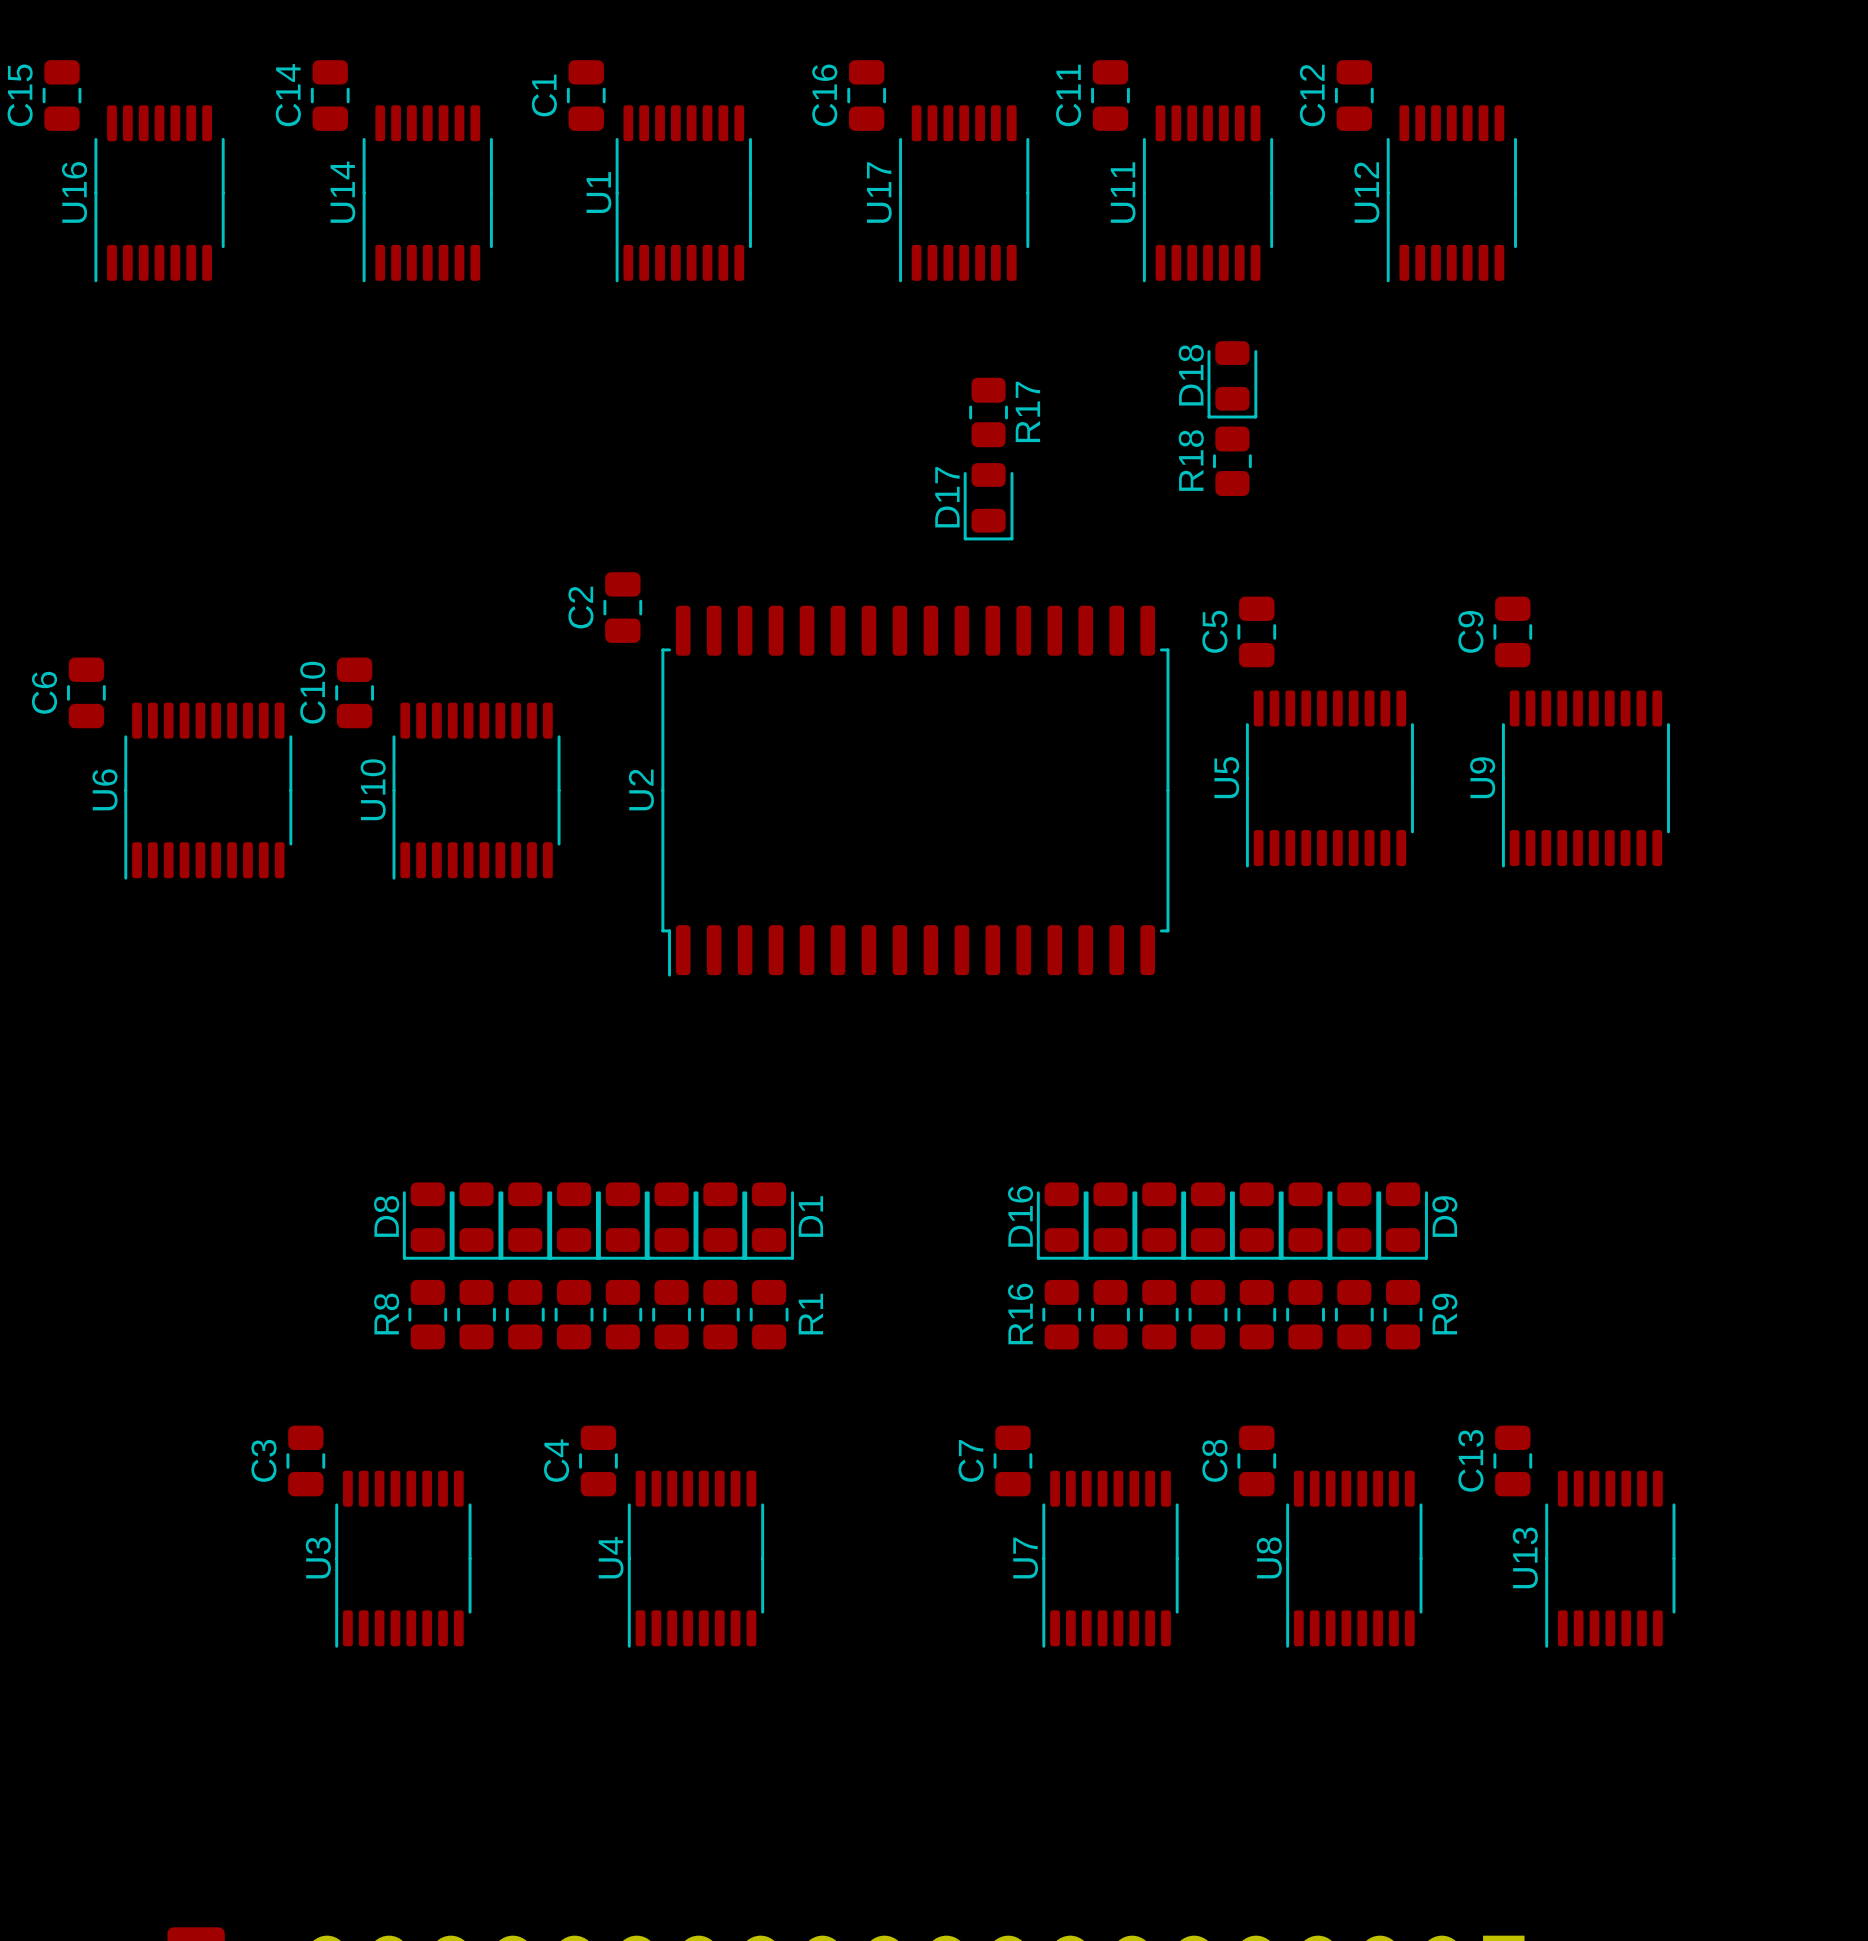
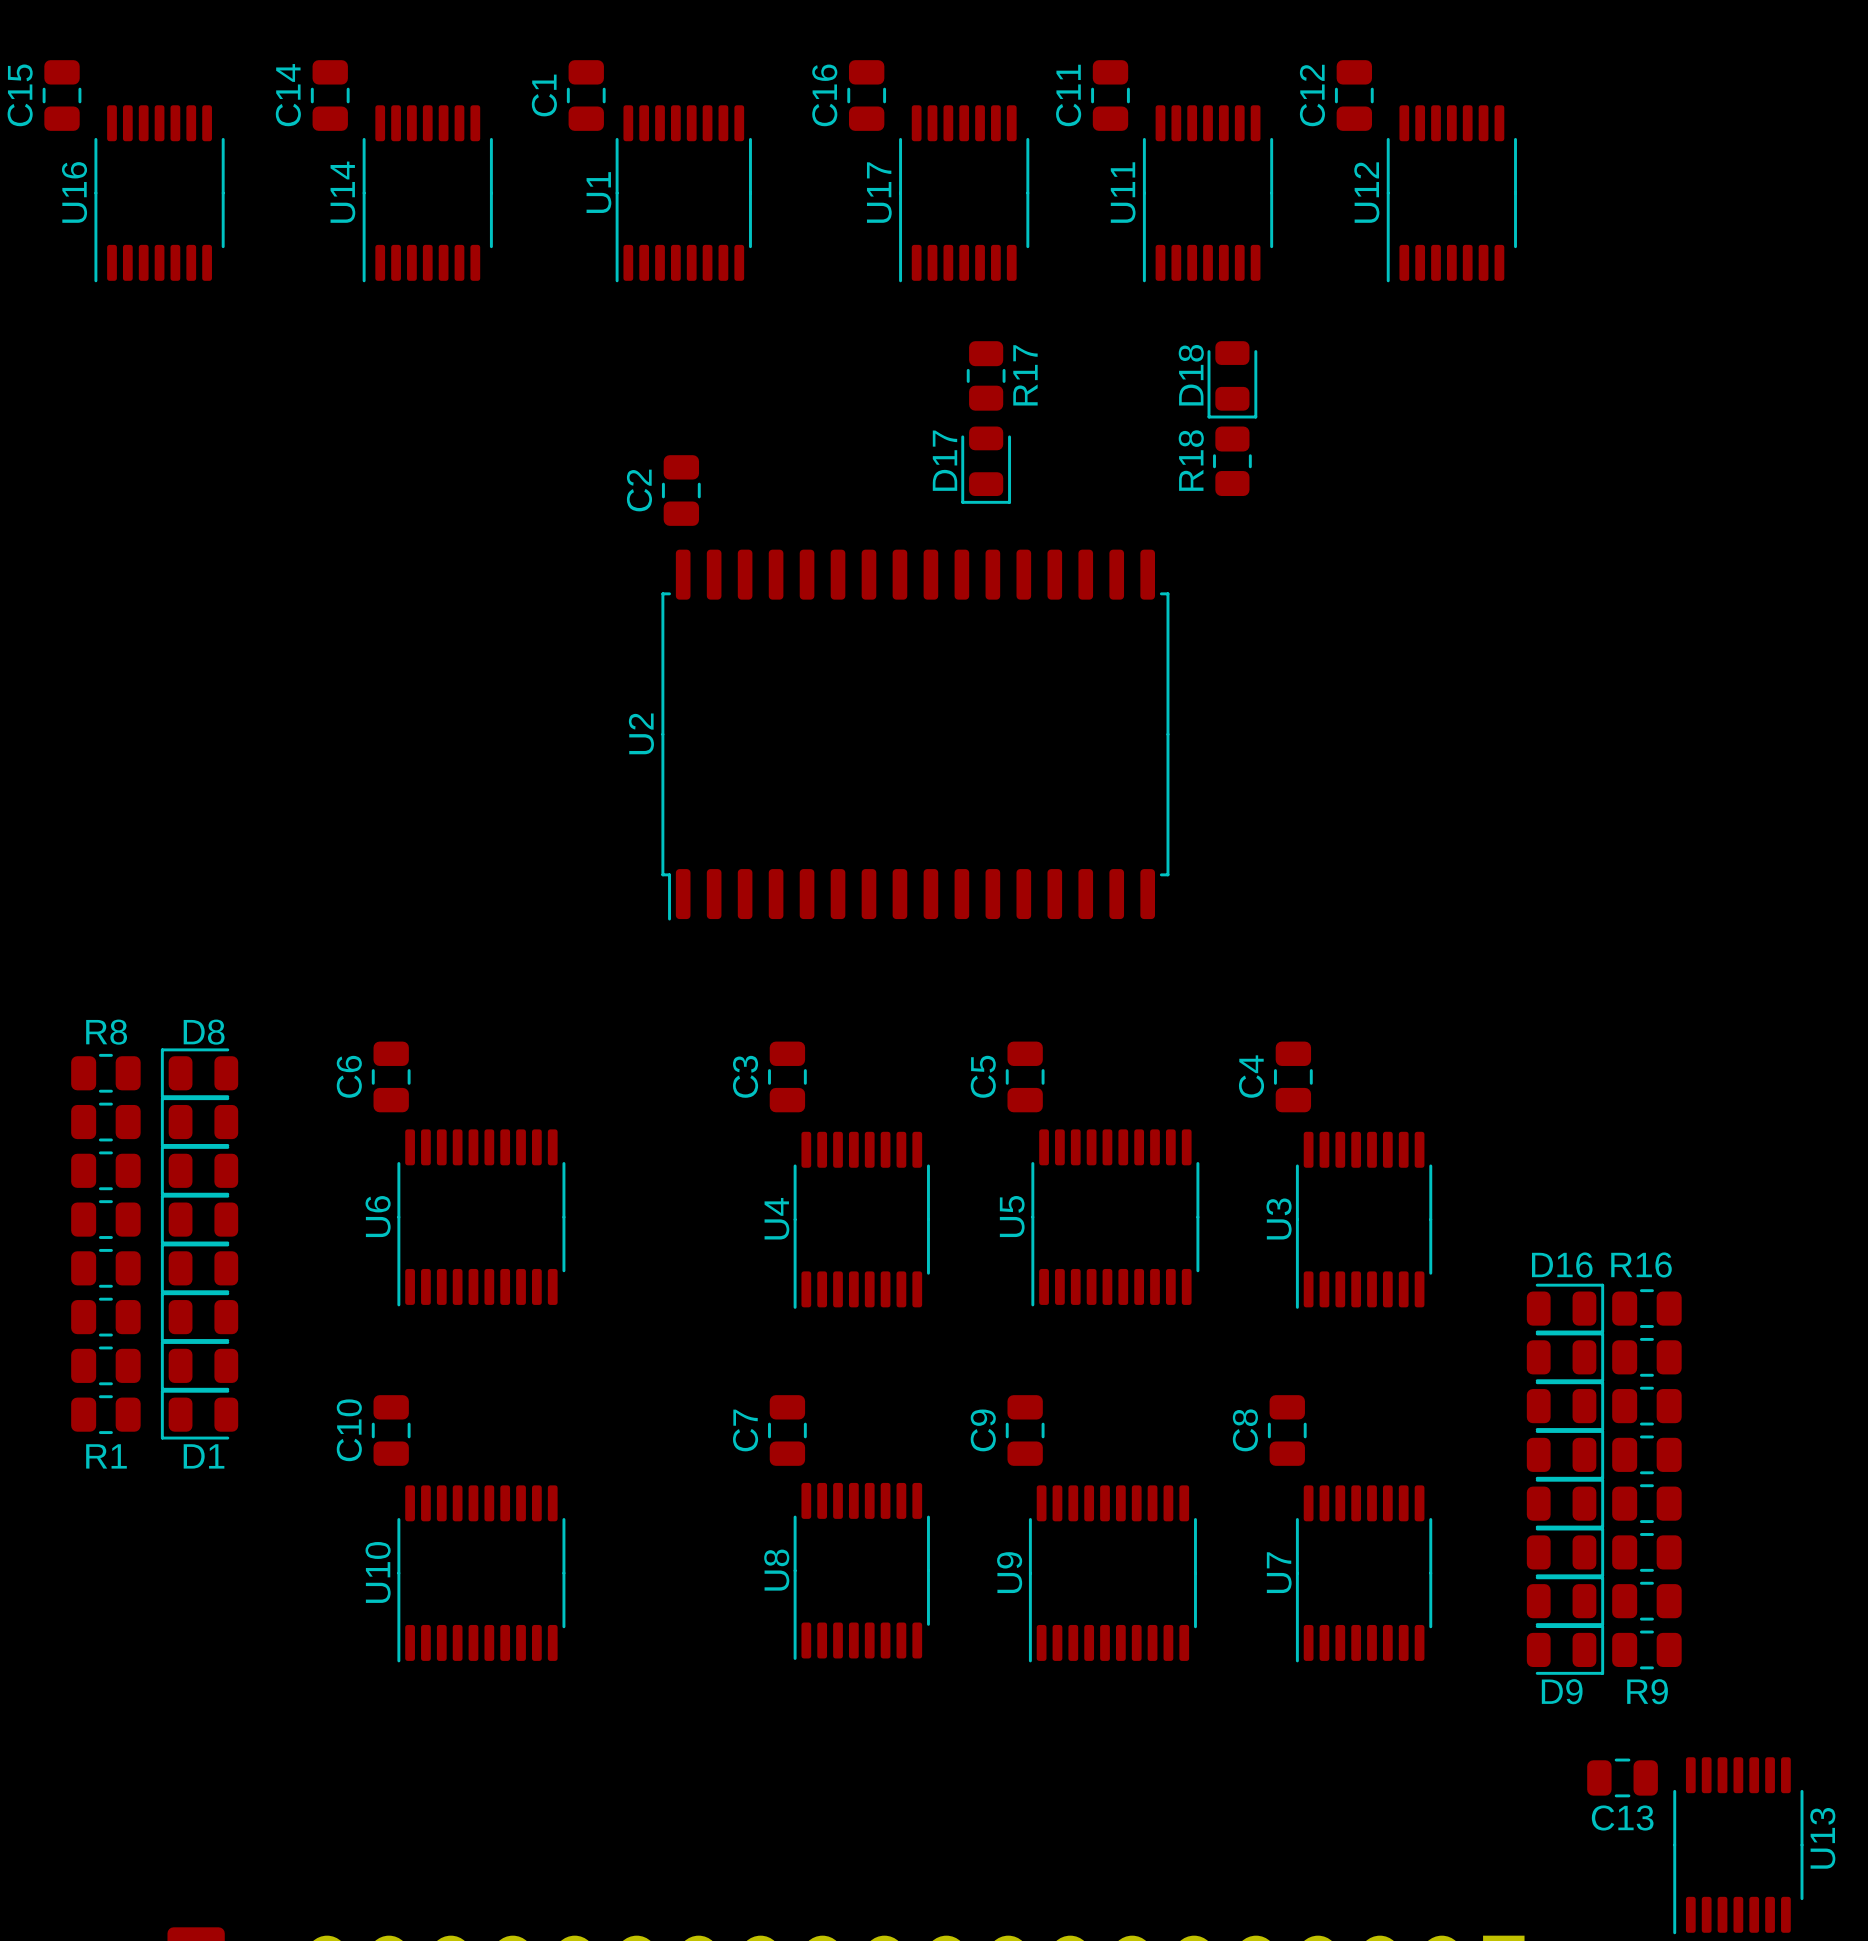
R17 position: (988, 412) -> (986, 375)
D17 position: (988, 501) -> (986, 465)
C2 position: (622, 607) -> (681, 490)
C5 position: (1256, 631) -> (1025, 1076)
C9 position: (1512, 631) -> (1025, 1430)
C6 position: (86, 692) -> (391, 1076)
C10 position: (354, 692) -> (391, 1430)
U5 position: (1329, 778) -> (1115, 1217)
U9 position: (1585, 778) -> (1112, 1573)
U6 position: (208, 791) -> (481, 1217)
U10 position: (476, 791) -> (481, 1573)
U2 position: (915, 791) -> (915, 735)
part: none -> (105, 1122)
part: none -> (199, 1122)
part: none -> (105, 1170)
part: none -> (199, 1170)
D16 name position: D16 (1020, 1216) -> D16 (1562, 1264)
D9 name position: D9 (1444, 1216) -> D9 (1562, 1691)
part: none -> (105, 1219)
part: none -> (199, 1219)
D8 rotation: 0° (427, 1221) -> 90° clockwise (199, 1073)
D8 position: (427, 1221) -> (199, 1073)
part: (476, 1221) -> none
part: (525, 1221) -> none
part: (574, 1221) -> none
part: (622, 1221) -> none
part: (671, 1221) -> none
part: (720, 1221) -> none
D1 rotation: 0° (769, 1221) -> 90° clockwise (199, 1414)
D1 position: (769, 1221) -> (199, 1414)
D16 rotation: 0° (1061, 1221) -> 90° counterclockwise (1565, 1308)
D16 position: (1061, 1221) -> (1565, 1308)
part: (1110, 1221) -> none
part: (1159, 1221) -> none
part: (1208, 1221) -> none
part: (1256, 1221) -> none
part: (1305, 1221) -> none
part: (1354, 1221) -> none
D9 rotation: 0° (1403, 1221) -> 90° counterclockwise (1565, 1649)
D9 position: (1403, 1221) -> (1565, 1649)
part: none -> (105, 1268)
part: none -> (199, 1268)
R8 rotation: 0° (427, 1314) -> 90° clockwise (105, 1073)
R8 position: (427, 1314) -> (105, 1073)
part: (476, 1314) -> none
part: (525, 1314) -> none
part: (574, 1314) -> none
part: (622, 1314) -> none
part: (671, 1314) -> none
part: (720, 1314) -> none
R1 rotation: 0° (769, 1314) -> 90° clockwise (105, 1414)
R1 position: (769, 1314) -> (105, 1414)
R16 rotation: 0° (1061, 1314) -> 90° clockwise (1646, 1308)
R16 position: (1061, 1314) -> (1646, 1308)
part: (1110, 1314) -> none
part: (1159, 1314) -> none
part: (1208, 1314) -> none
part: (1256, 1314) -> none
part: (1305, 1314) -> none
part: (1354, 1314) -> none
R9 rotation: 0° (1403, 1314) -> 90° clockwise (1646, 1649)
R9 position: (1403, 1314) -> (1646, 1649)
part: none -> (105, 1317)
part: none -> (199, 1317)
part: none -> (1565, 1357)
part: none -> (1646, 1357)
part: none -> (105, 1365)
part: none -> (199, 1365)
part: none -> (1565, 1406)
part: none -> (1646, 1406)
part: none -> (1565, 1454)
part: none -> (1646, 1454)
C3 position: (305, 1460) -> (787, 1076)
C4 position: (598, 1460) -> (1293, 1076)
C7 position: (1012, 1460) -> (787, 1430)
C8 position: (1256, 1460) -> (1287, 1430)
C13 name position: C13 (1470, 1460) -> C13 (1622, 1818)
C13 rotation: 0° (1512, 1460) -> 90° clockwise (1622, 1777)
C13 position: (1512, 1460) -> (1622, 1777)
part: none -> (1565, 1503)
part: none -> (1646, 1503)
part: none -> (1565, 1552)
part: none -> (1646, 1552)
U13 name position: U13 (1525, 1557) -> U13 (1822, 1838)
U3 position: (403, 1559) -> (1364, 1220)
U4 position: (695, 1559) -> (861, 1220)
U7 position: (1110, 1559) -> (1364, 1573)
U8 position: (1354, 1559) -> (861, 1571)
U13 position: (1610, 1559) -> (1738, 1845)
part: none -> (1565, 1601)
part: none -> (1646, 1601)

